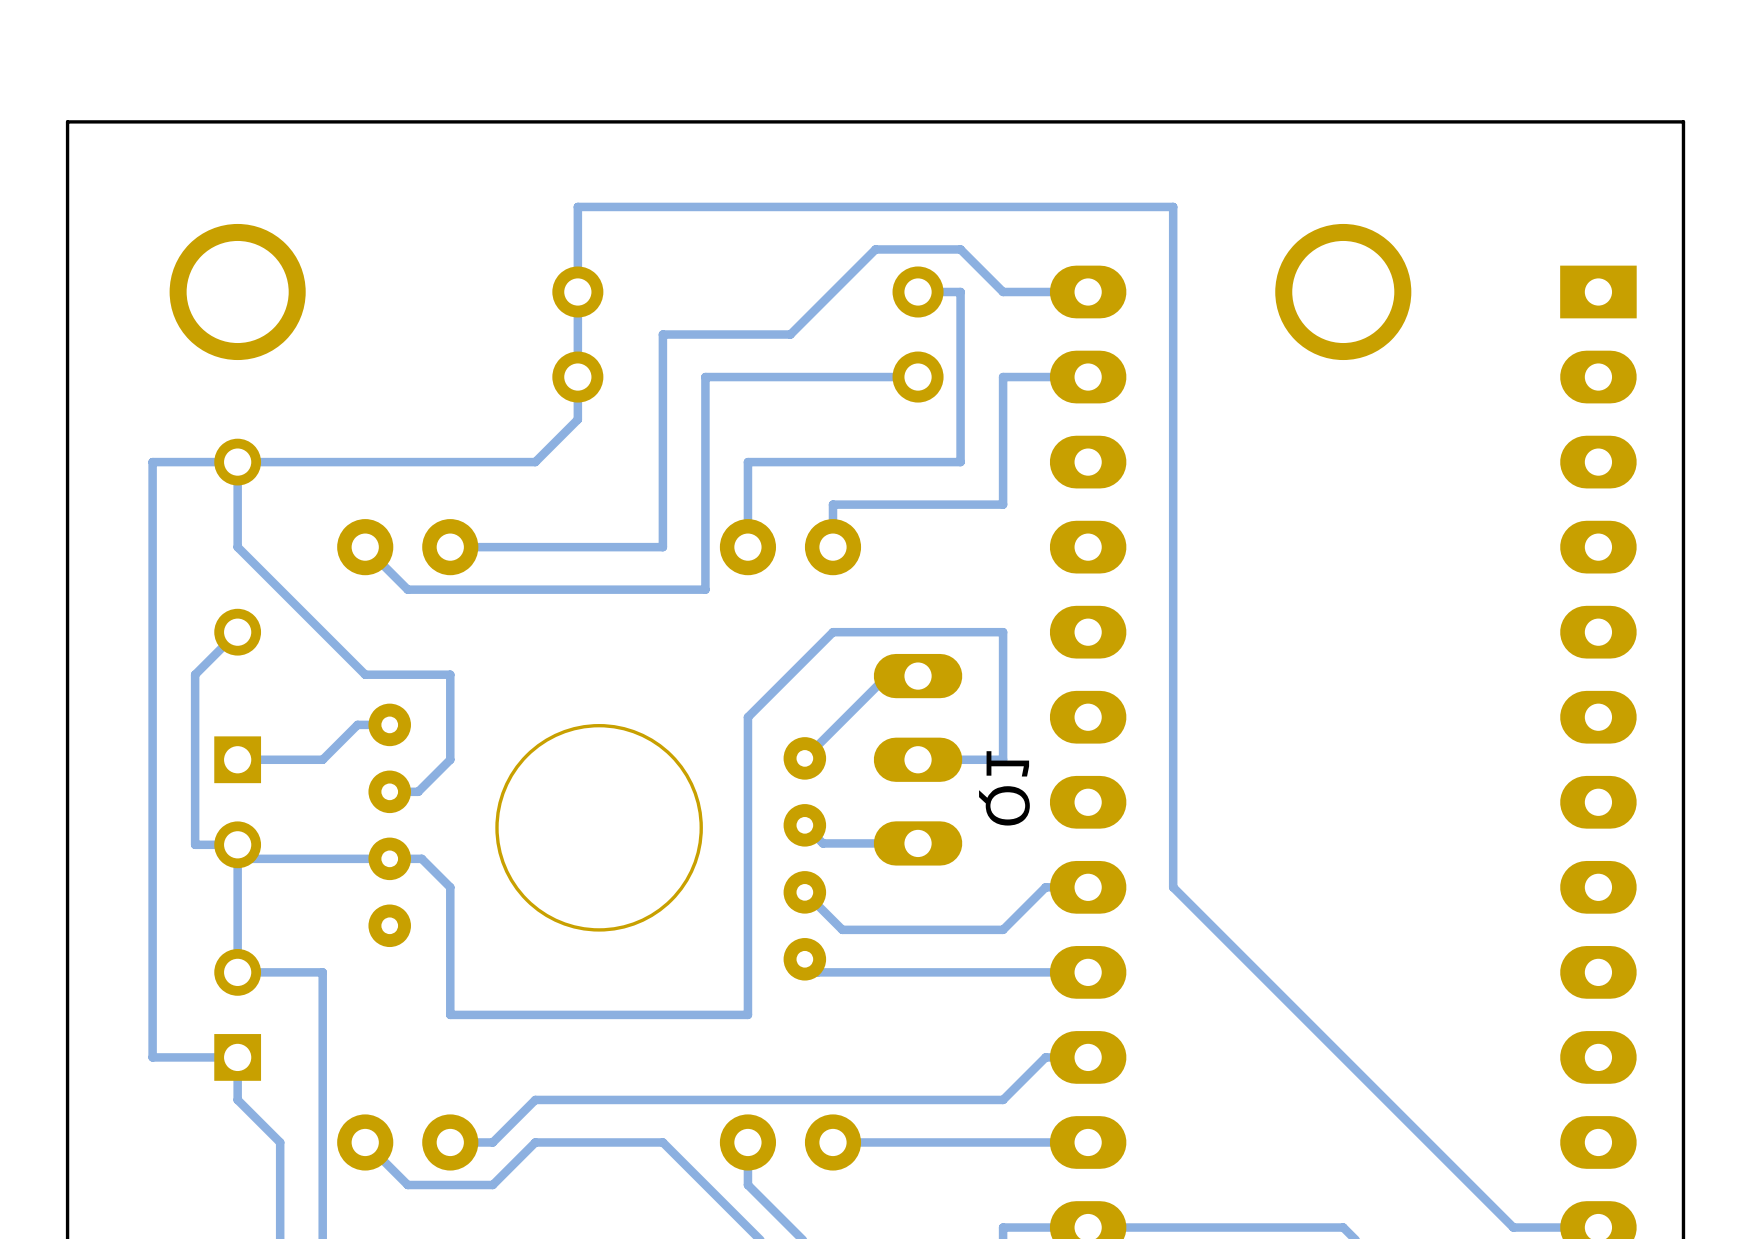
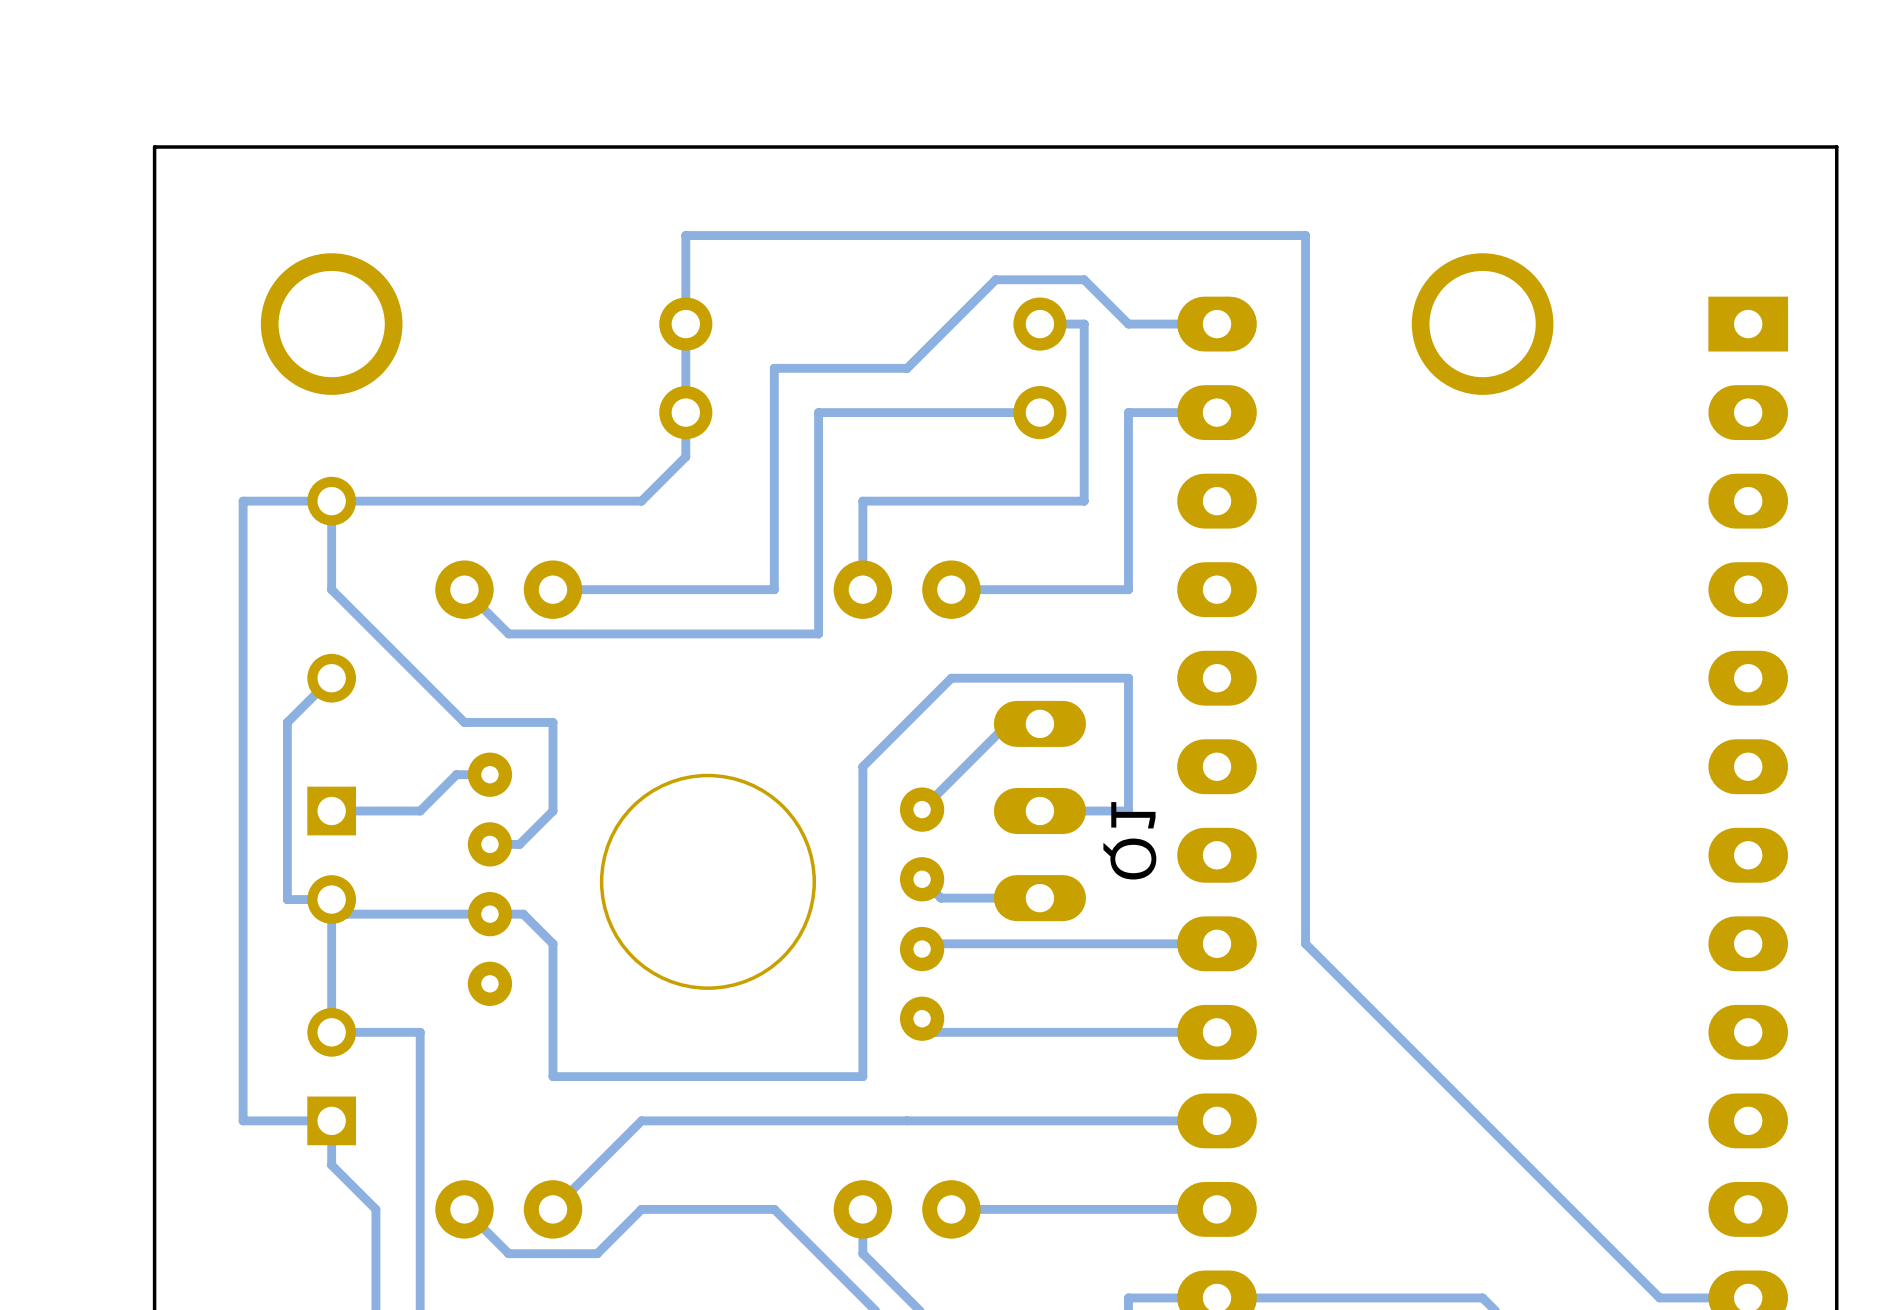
track: (1003, 504) (832, 504) (832, 547) -> (1128, 545) (1128, 589) (951, 589)
track: (1045, 887) (1003, 929) (842, 929) (804, 892) -> (1172, 943) (927, 943) (922, 949)
track: (1045, 1057) (1003, 1099) (535, 1099) (492, 1142) (450, 1142) -> (1172, 1120) (641, 1120) (553, 1209)

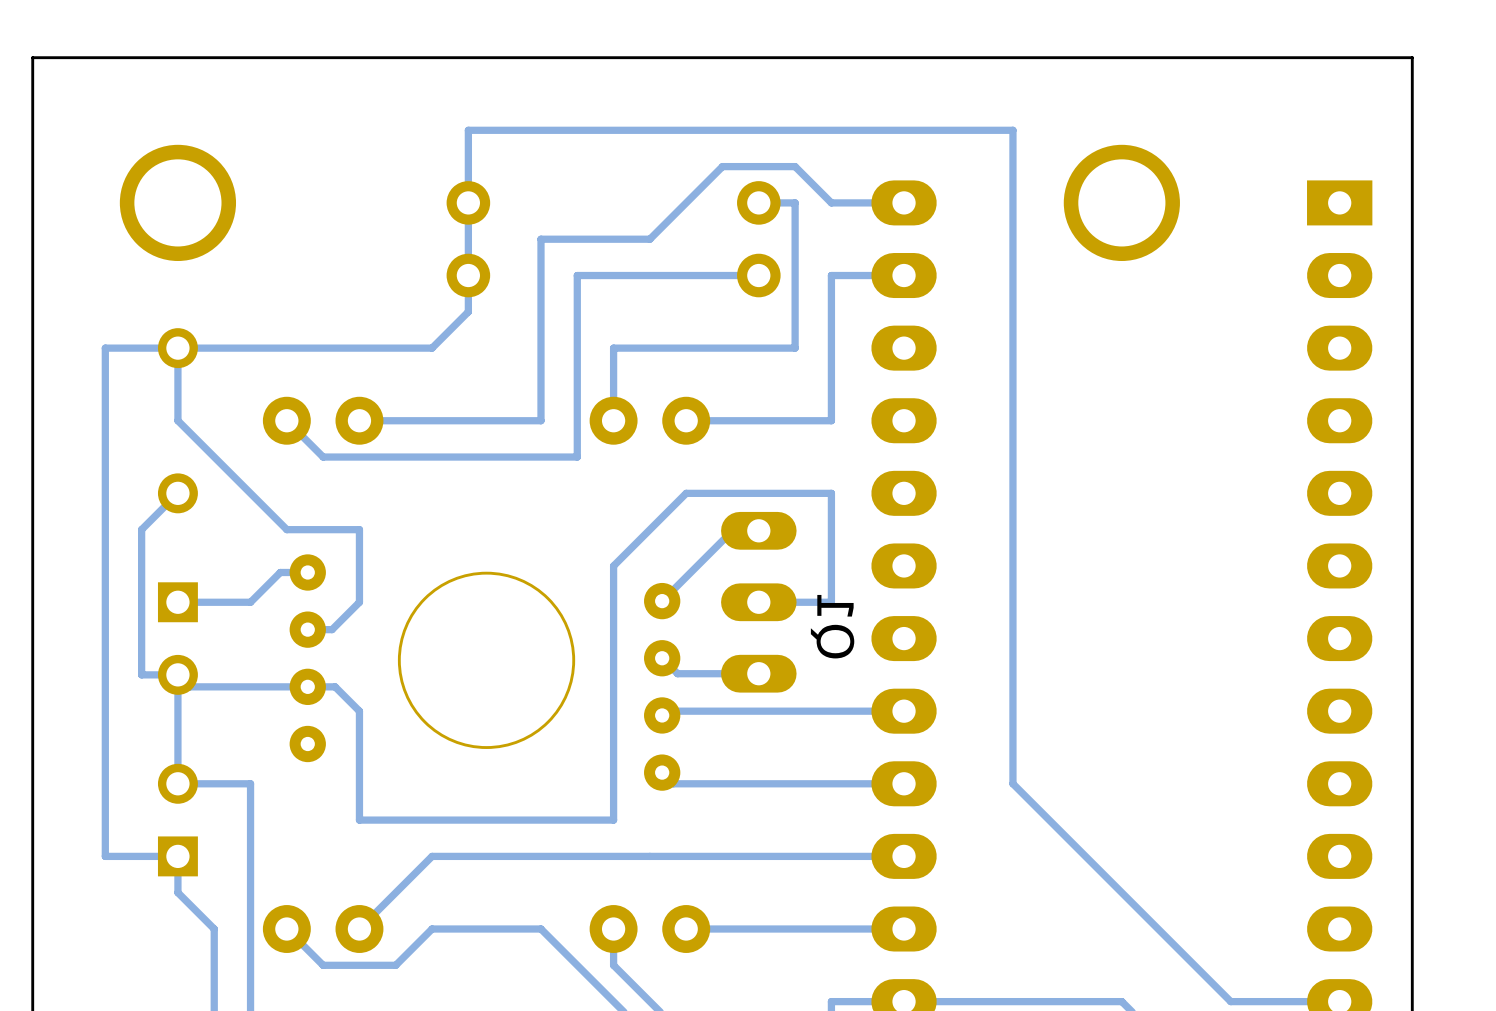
track: (1305, 235) (1305, 943) (1659, 1297) -> (976, 130) (1012, 130) (1012, 783) (1230, 1001) (1267, 1001)

